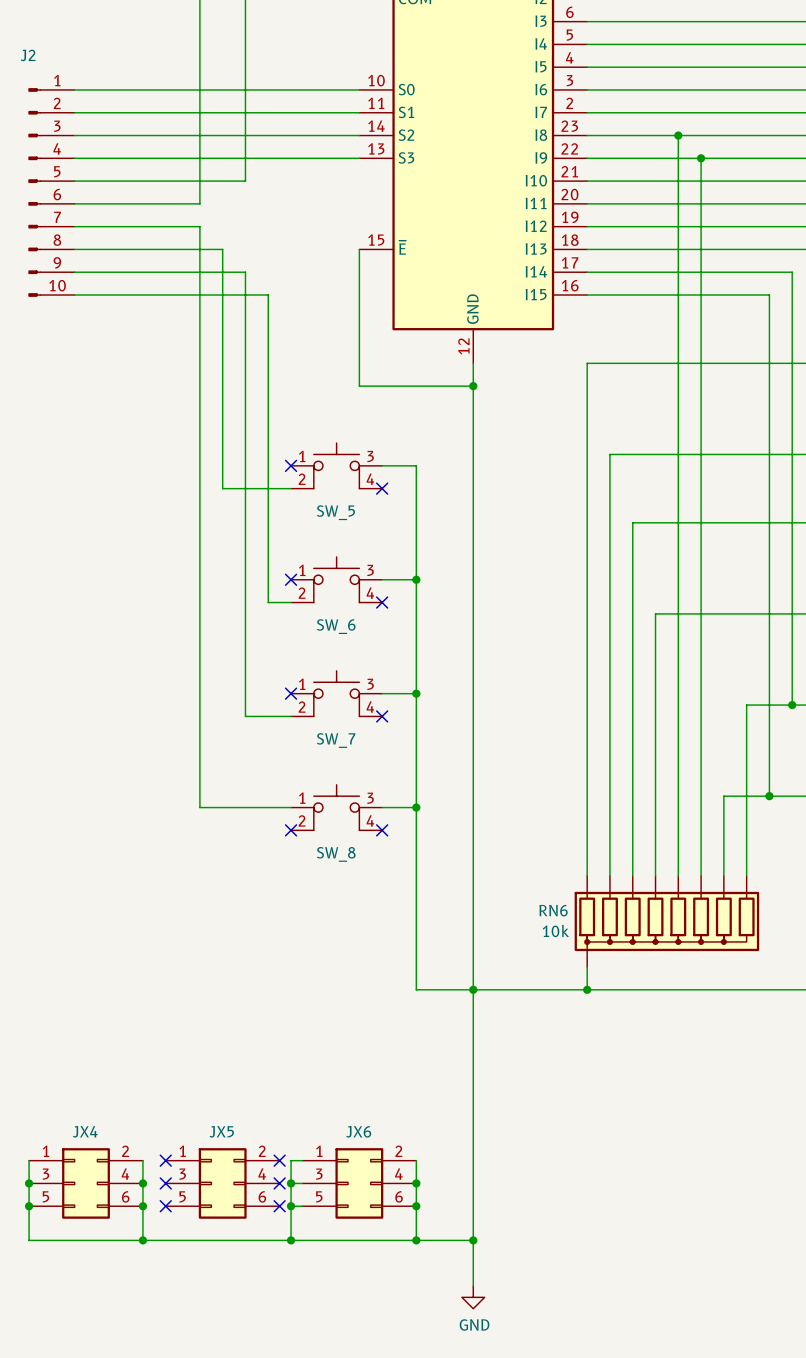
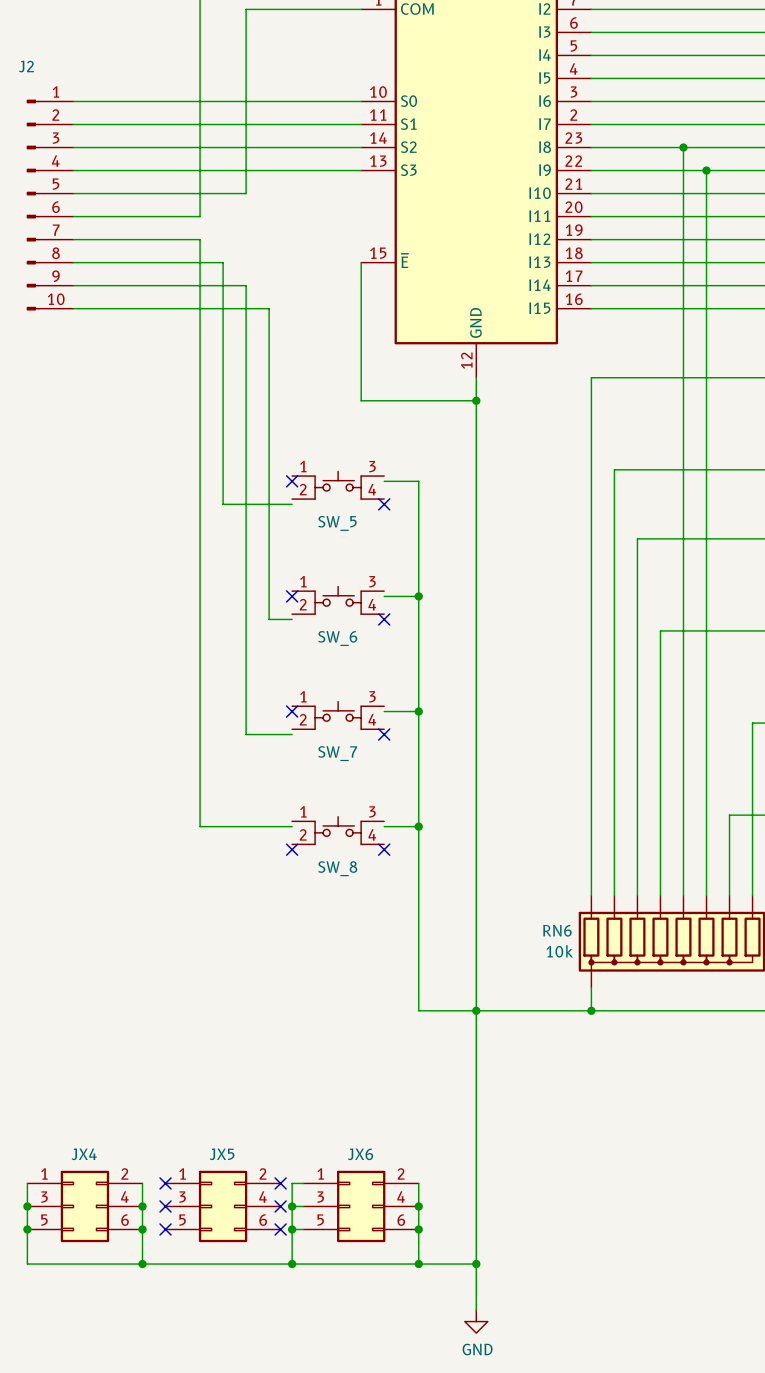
SW_5 symbol: [291, 443, 383, 489] -> [292, 471, 385, 500]
SW_6 symbol: [291, 556, 383, 603] -> [292, 586, 385, 615]
SW_7 symbol: [291, 670, 383, 717] -> [292, 701, 385, 730]
SW_8 symbol: [291, 784, 383, 831] -> [292, 816, 385, 845]

